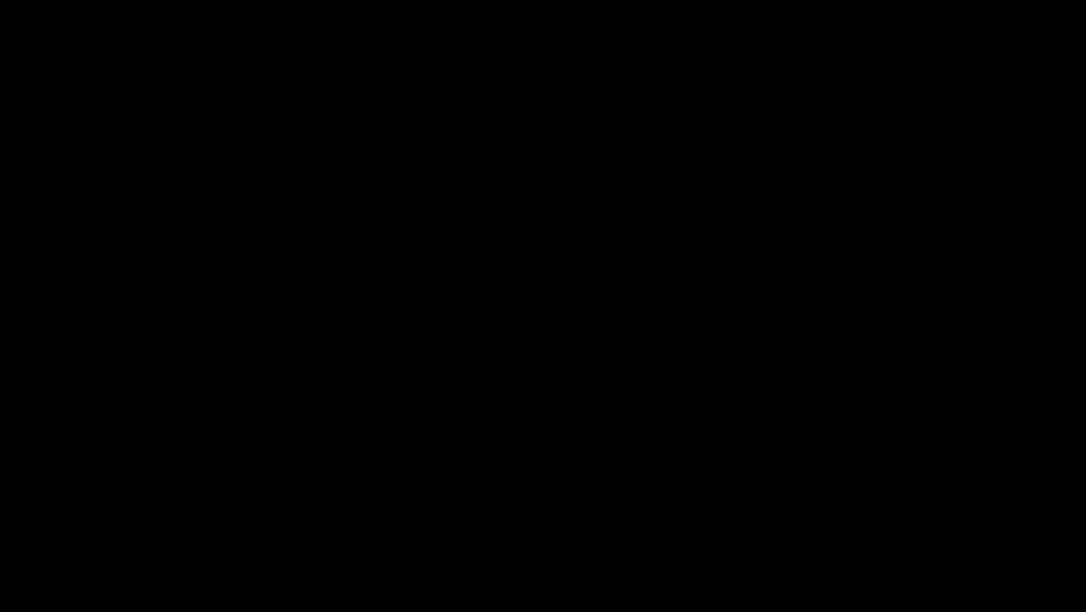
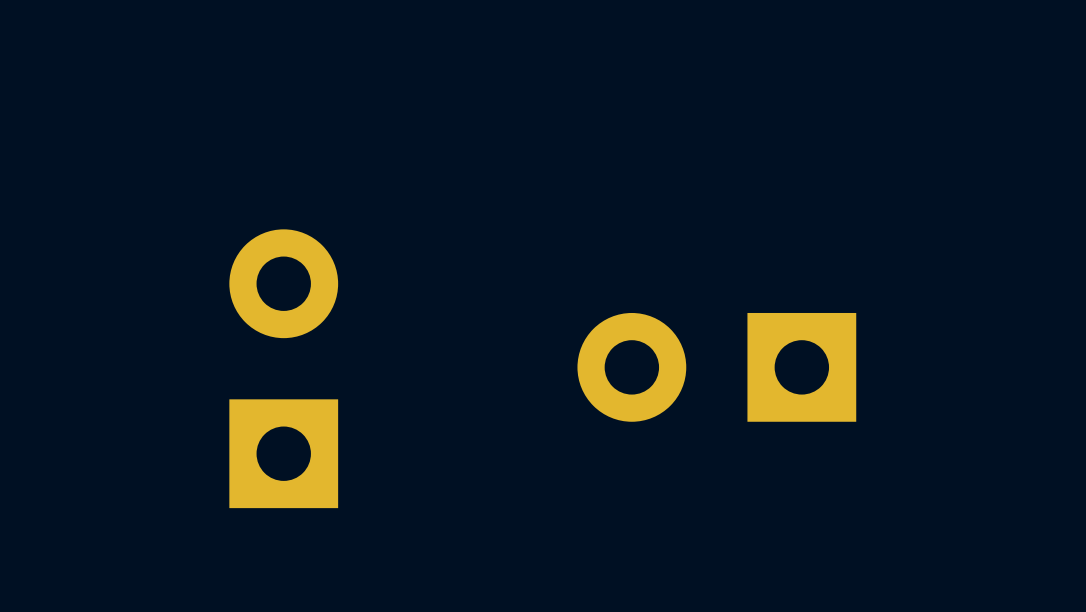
part: none -> (716, 367)
part: none -> (283, 368)

